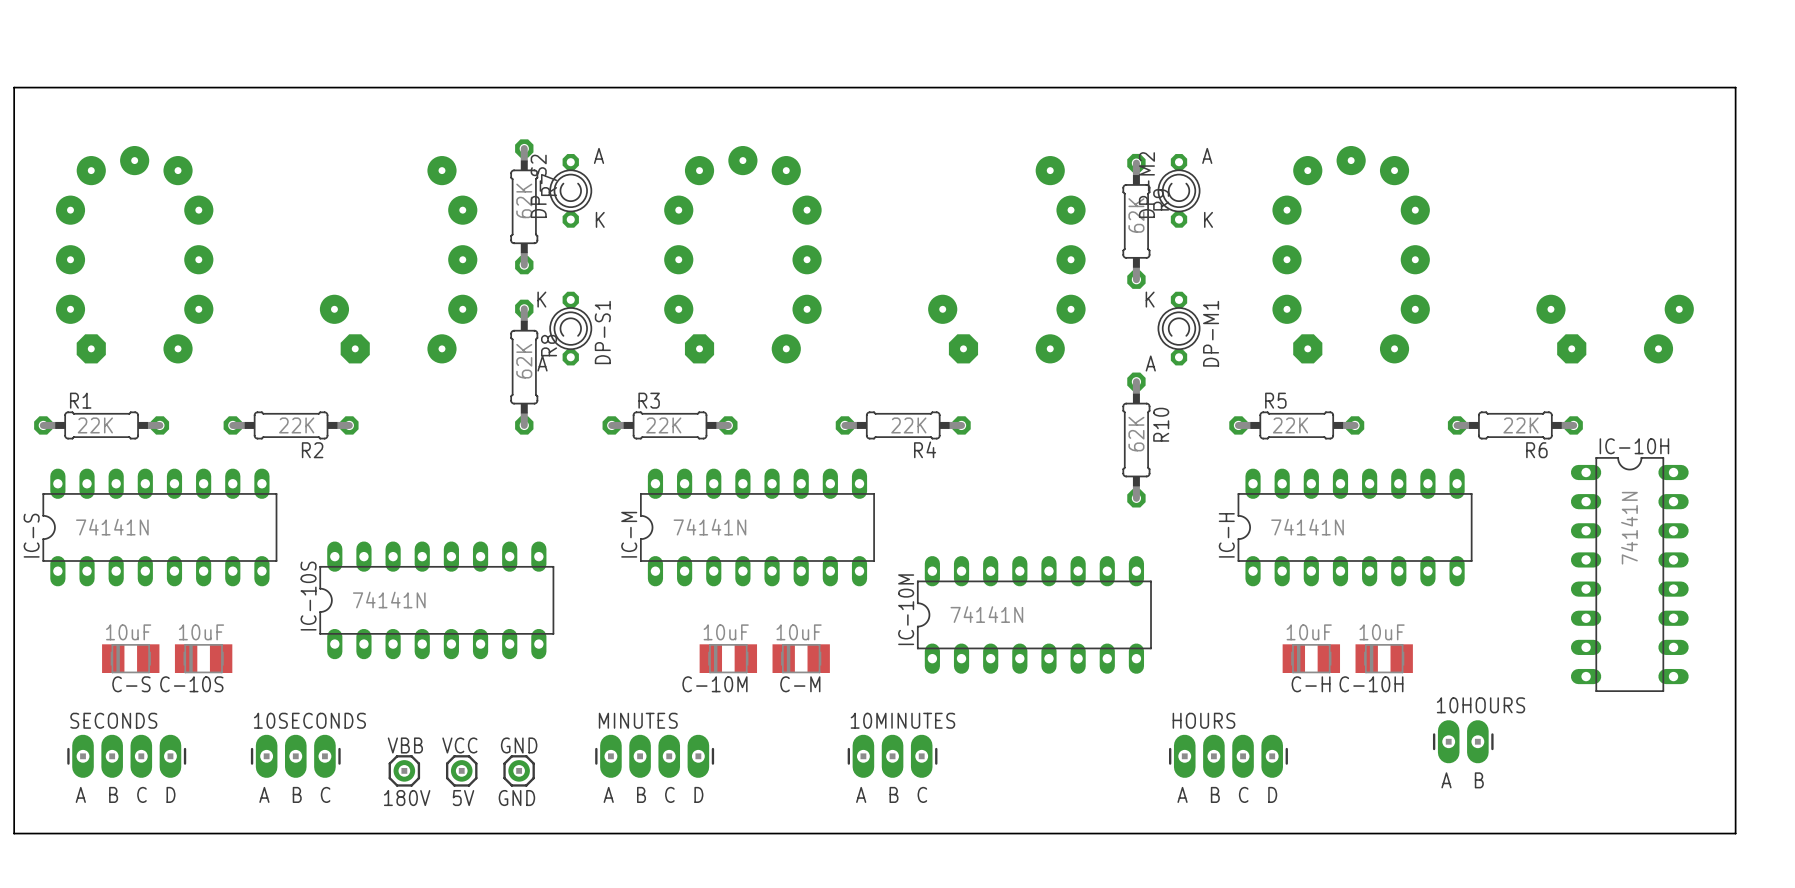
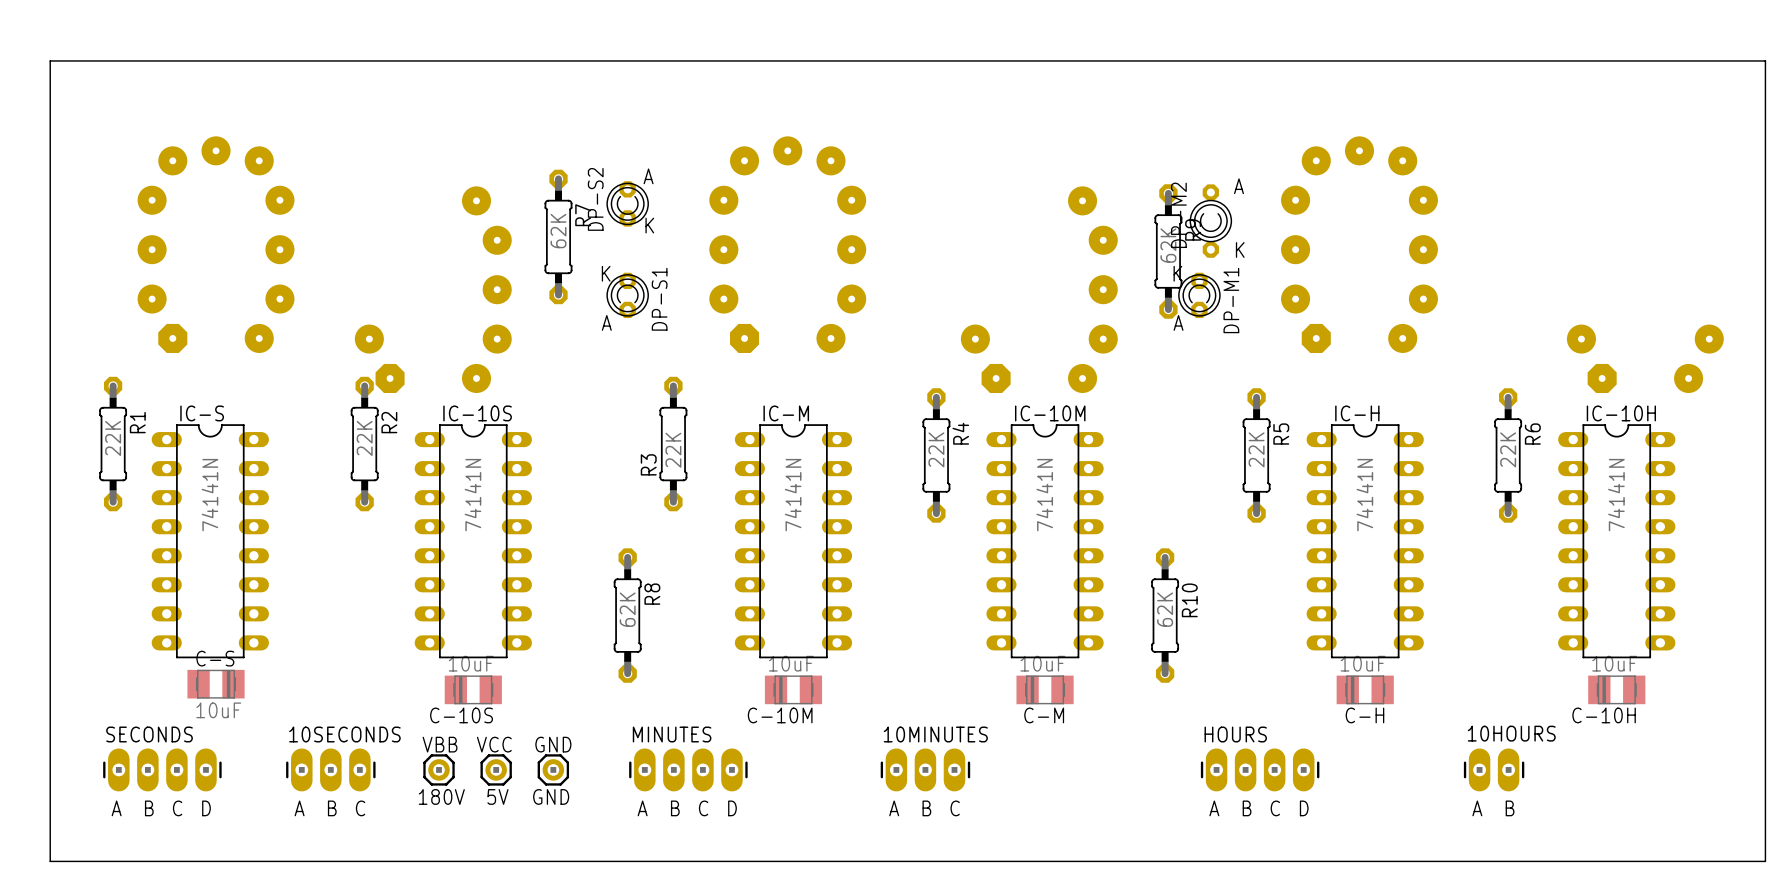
board edge: (14, 87) (1735, 87) -> (50, 118) (50, 60) (1765, 60) (1765, 118)
DP-S2 footprint: [549, 154, 593, 228] -> [606, 181, 649, 227]
part position: (134, 254) -> (216, 244)
part position: (742, 254) -> (787, 244)
part position: (1351, 254) -> (1359, 244)
DP-S1 footprint: [549, 291, 593, 366] -> [606, 272, 649, 319]
DP-M1 footprint: [1157, 291, 1201, 366] -> [1178, 272, 1221, 319]
R8 position: (524, 367) -> (627, 615)
R3 name position: R3 (649, 400) -> R3 (648, 464)
R1 rotation: 0° (101, 425) -> 90° clockwise (113, 444)
R2 rotation: 0° (291, 425) -> 90° clockwise (364, 444)
R3 rotation: 0° (670, 425) -> 90° clockwise (673, 444)
R4 rotation: 0° (903, 425) -> 90° clockwise (936, 455)
R5 rotation: 0° (1296, 425) -> 90° clockwise (1256, 455)
R6 rotation: 0° (1515, 425) -> 90° clockwise (1508, 455)
R10 position: (1136, 440) -> (1165, 615)
R4 name position: R4 (925, 449) -> R4 (960, 433)
R2 name position: R2 (312, 450) -> R2 (389, 422)
R6 name position: R6 (1536, 450) -> R6 (1532, 434)
IC-S rotation: 0° (159, 527) -> 90° clockwise (210, 541)
IC-M rotation: 0° (757, 527) -> 90° clockwise (793, 541)
IC-H rotation: 0° (1355, 527) -> 90° clockwise (1365, 541)
IC-10H position: (1629, 574) -> (1616, 541)
IC-10S rotation: 0° (436, 600) -> 90° clockwise (473, 541)
IC-10M rotation: 0° (1034, 614) -> 90° clockwise (1045, 541)
C-S rotation: 0° (130, 658) -> 180° (216, 684)
C-S position: (130, 658) -> (216, 684)
C-10S position: (203, 658) -> (473, 689)
C-10M position: (728, 658) -> (793, 689)
C-M position: (801, 658) -> (1045, 689)
C-H position: (1311, 658) -> (1365, 689)
C-10H position: (1384, 658) -> (1616, 689)
SECONDS position: (126, 756) -> (162, 769)
10SECONDS position: (295, 756) -> (330, 769)
MINUTES position: (654, 756) -> (688, 769)
10MINUTES position: (892, 756) -> (925, 769)
HOURS position: (1228, 756) -> (1260, 769)
VBB position: (404, 770) -> (439, 769)
VCC position: (461, 770) -> (496, 769)
GND position: (519, 770) -> (553, 769)
text position: A (80, 794) -> A (116, 808)
text position: B (113, 794) -> B (149, 808)
text position: C (141, 794) -> C (177, 808)
text position: D (170, 794) -> D (206, 808)
text position: A (264, 794) -> A (299, 808)
text position: B (297, 794) -> B (332, 808)
text position: C (325, 794) -> C (360, 808)
text position: A (608, 794) -> A (642, 808)
text position: B (641, 794) -> B (675, 808)
text position: C (669, 794) -> C (703, 808)
text position: D (698, 794) -> D (732, 808)
text position: A (861, 794) -> A (894, 808)
text position: B (894, 794) -> B (926, 808)
text position: C (922, 794) -> C (955, 808)
text position: A (1182, 794) -> A (1214, 808)
text position: B (1215, 794) -> B (1247, 808)
text position: C (1243, 794) -> C (1275, 808)
text position: D (1272, 794) -> D (1304, 808)
text position: 180V (407, 798) -> 180V (441, 796)
text position: 5V (463, 798) -> 5V (497, 796)
text position: GND (516, 798) -> GND (551, 796)

